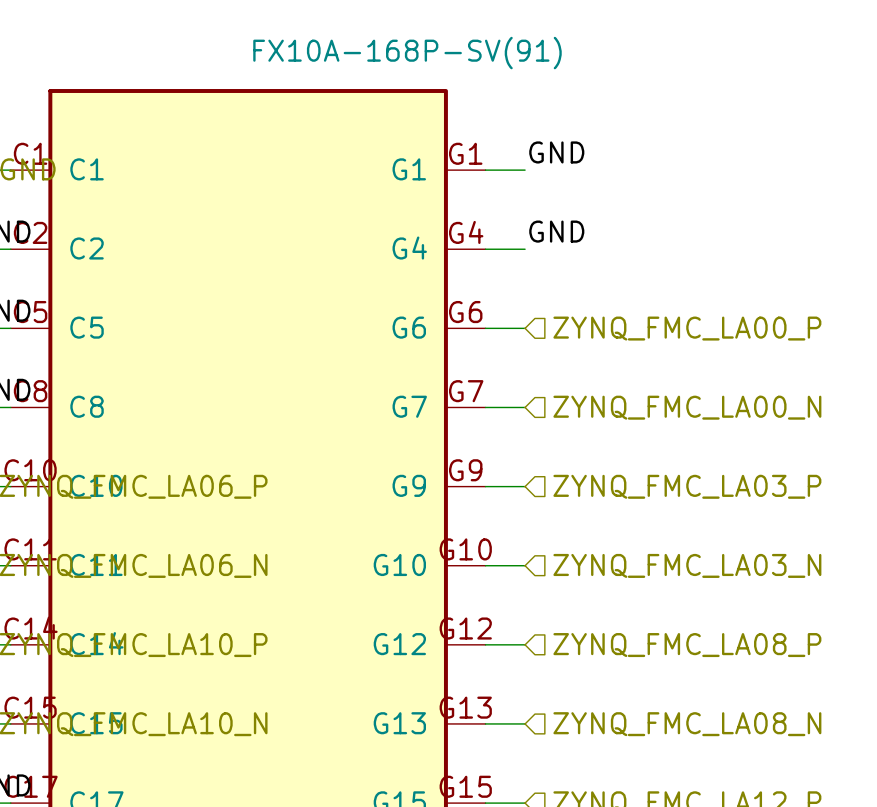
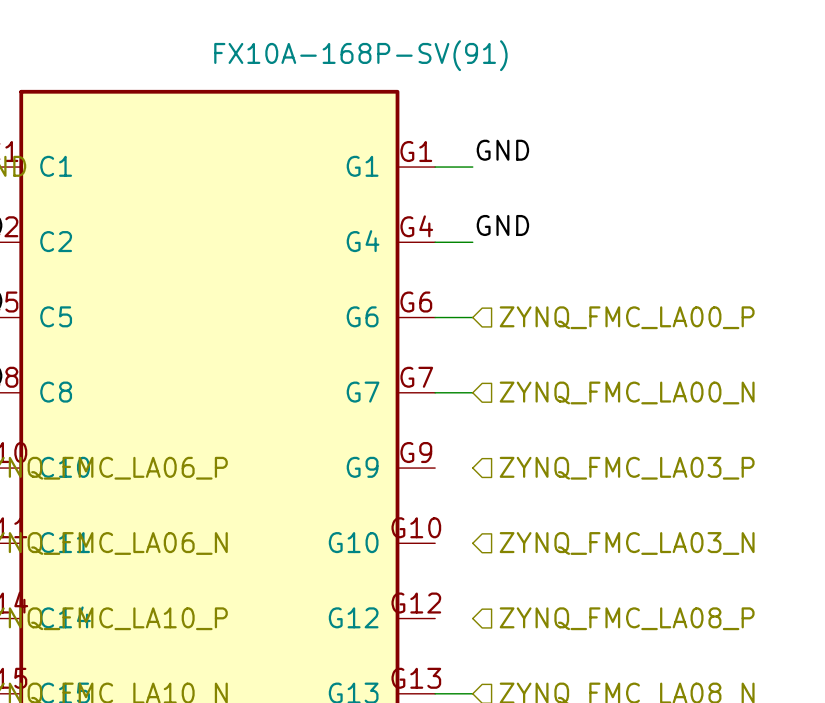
wire: (485, 486) (525, 486) -> none
wire: (485, 565) (525, 565) -> none
wire: (485, 644) (525, 644) -> none

